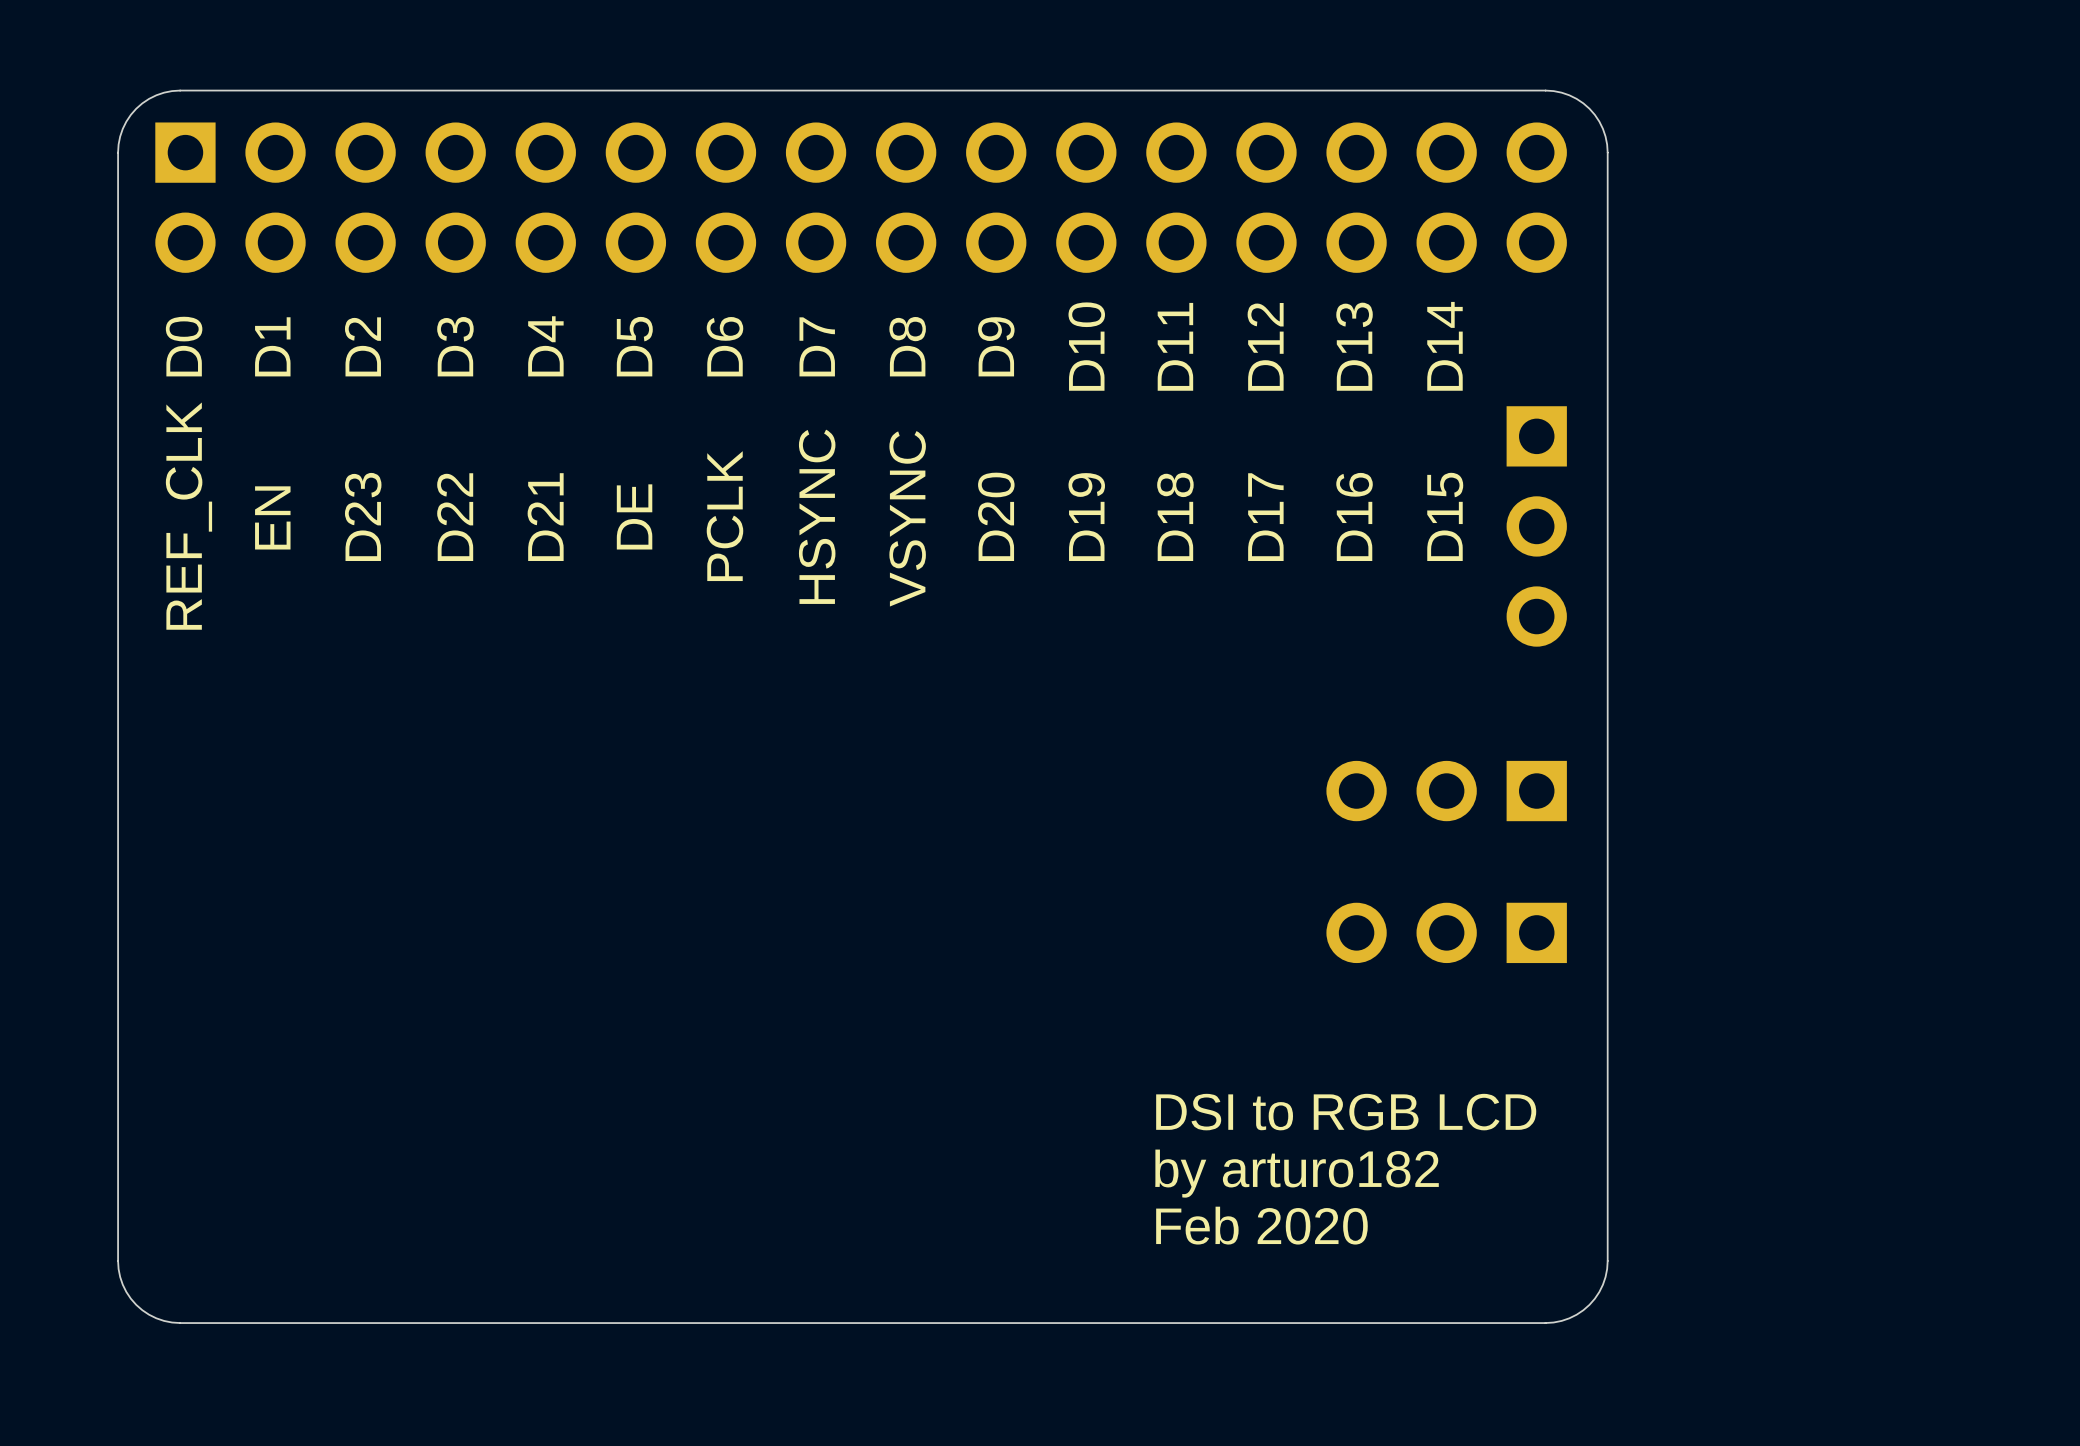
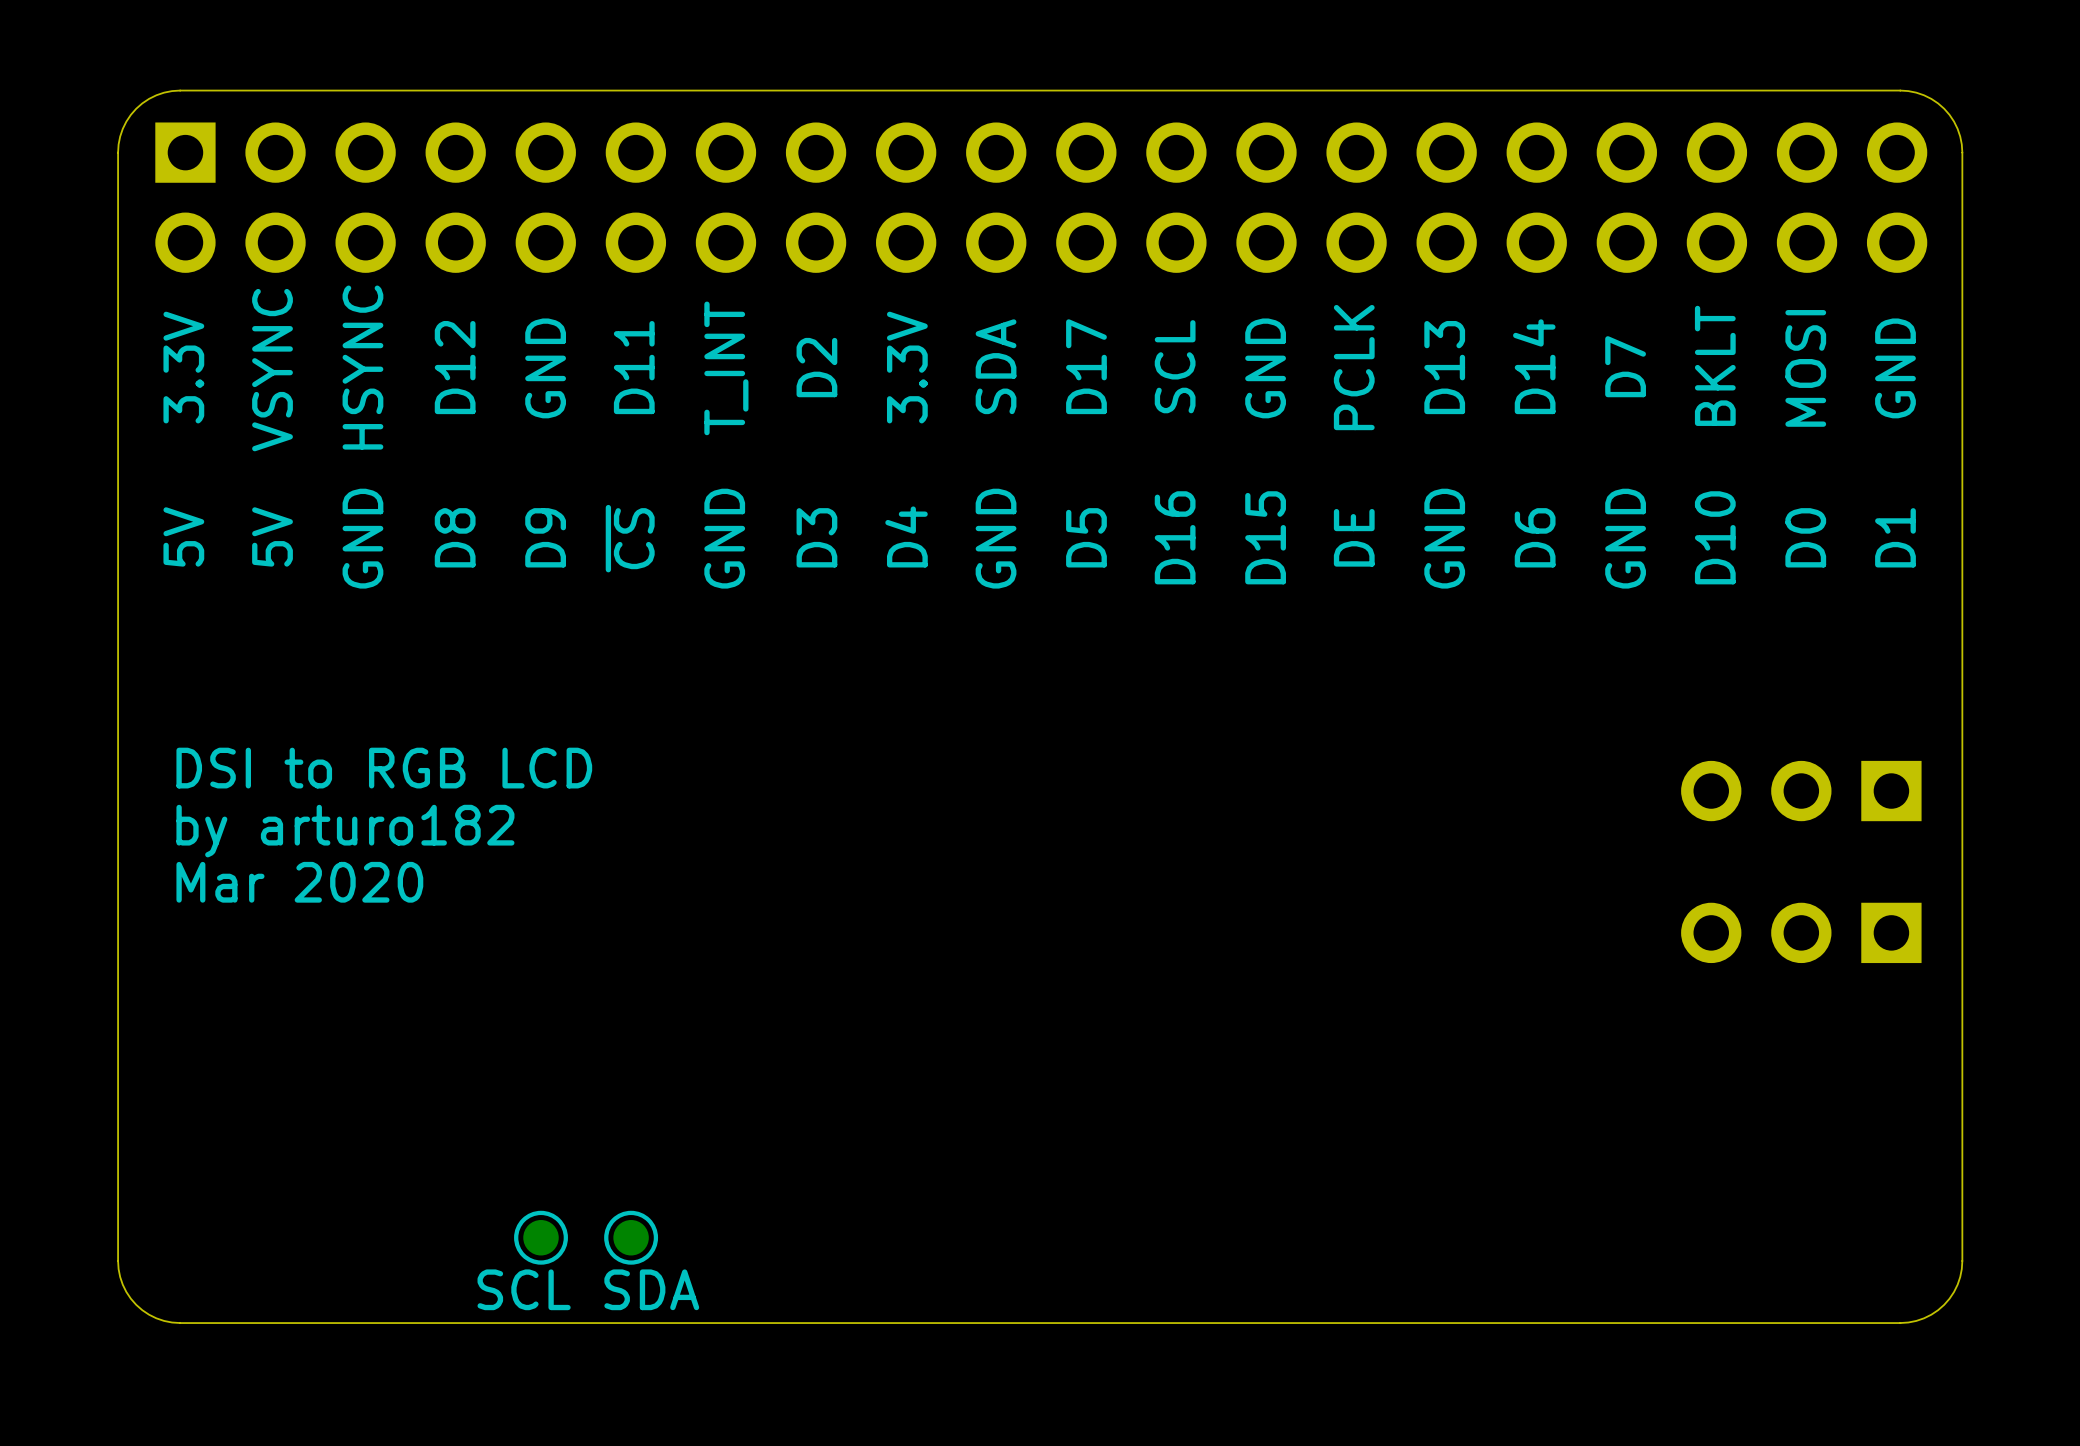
board edge: (1545, 90) (1569, 95) (1589, 108) (1602, 128) (1607, 152) (1607, 1260) (1602, 1284) (1589, 1304) (1569, 1318) (1545, 1323) -> (1545, 90) (1908, 91) (1931, 98) (1949, 114) (1960, 136) (1962, 152) (1962, 1260) (1957, 1284) (1949, 1298) (1938, 1310) (1924, 1318) (1908, 1322) (1545, 1323)
part: none -> (1041, 197)
text: D0 (184, 346) -> 3.3V (183, 367)
text: D1 (272, 346) -> none
text position: D2 (362, 346) -> D2 (816, 367)
text position: D3 (455, 346) -> D3 (816, 537)
text position: D4 (545, 346) -> D4 (906, 536)
text position: D5 (634, 346) -> D5 (1086, 537)
text position: D6 (724, 346) -> D6 (1535, 537)
text position: D7 (817, 346) -> D7 (1625, 366)
text position: D8 (907, 346) -> D8 (455, 537)
text position: D9 (996, 346) -> D9 (545, 537)
text position: D10 (1086, 346) -> D10 (1715, 537)
text position: D11 (1175, 346) -> D11 (634, 367)
text position: D12 (1265, 346) -> D12 (455, 367)
text position: D13 (1354, 346) -> D13 (1444, 367)
text position: D14 (1444, 346) -> D14 (1534, 366)
text: none -> BKLT (1715, 365)
text: none -> 3.3V (907, 367)
text: none -> SDA (996, 366)
text: none -> GND (545, 368)
text: none -> T_INT (726, 368)
text: none -> SCL (1175, 366)
text: none -> GND (1265, 368)
text: none -> MOSI (1805, 368)
text: none -> GND (1895, 368)
text: REF_CLK (188, 516) -> 5V (183, 536)
text: D23 (363, 516) -> GND (362, 538)
text position: DE (634, 516) -> DE (1354, 537)
text position: PCLK (724, 516) -> PCLK (1354, 367)
text position: HSYNC (817, 516) -> HSYNC (362, 367)
text: D20 (996, 516) -> GND (996, 538)
text: D18 (1175, 516) -> none
text position: D16 (1354, 516) -> D16 (1175, 537)
text position: D15 (1445, 516) -> D15 (1265, 537)
text: EN (272, 517) -> 5V (272, 536)
text: D22 (455, 517) -> none
text: D21 (545, 517) -> none
text: D19 (1086, 517) -> none
text position: D17 (1265, 517) -> D17 (1086, 366)
text position: VSYNC (907, 518) -> VSYNC (272, 370)
part: (1536, 526) -> none
text: none -> D0 (1805, 537)
text: none -> D1 (1895, 537)
text: none -> ~{CS} (630, 538)
text: none -> GND (724, 538)
text: none -> GND (1444, 538)
text: none -> GND (1625, 538)
text: none -> DSI to RGB LCD (384, 768)
part: (1446, 791) -> none
part: none -> (1801, 791)
text: none -> by arturo182 (345, 831)
text: none -> Mar 2020 (299, 882)
part: (1446, 932) -> none
part: none -> (1801, 932)
text: DSI to RGB LCD (1346, 1112) -> none
text: by arturo182 (1297, 1173) -> none
text: Feb 2020 (1261, 1225) -> none
part: none -> (541, 1237)
part: none -> (631, 1237)
text: none -> SCL (524, 1289)
text: none -> SDA (651, 1289)

